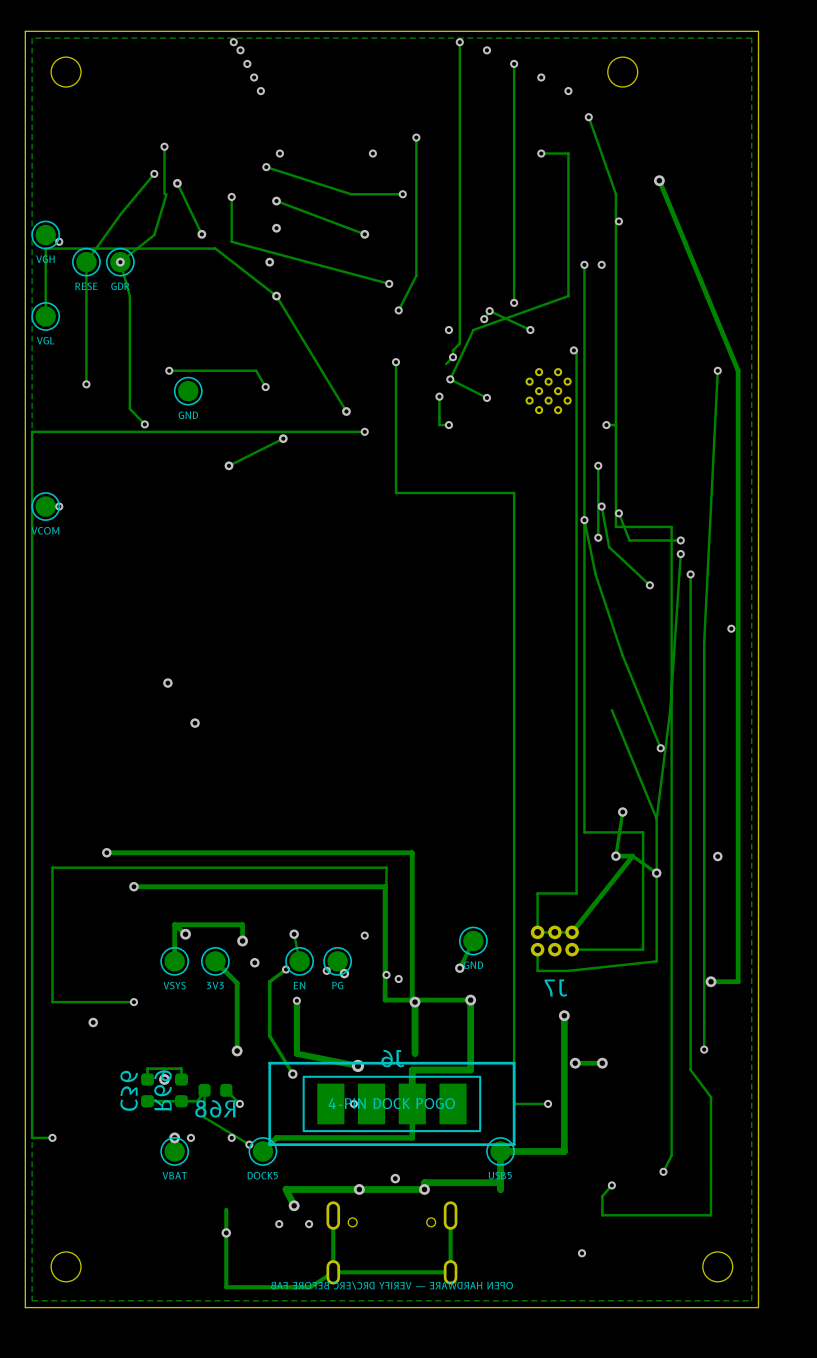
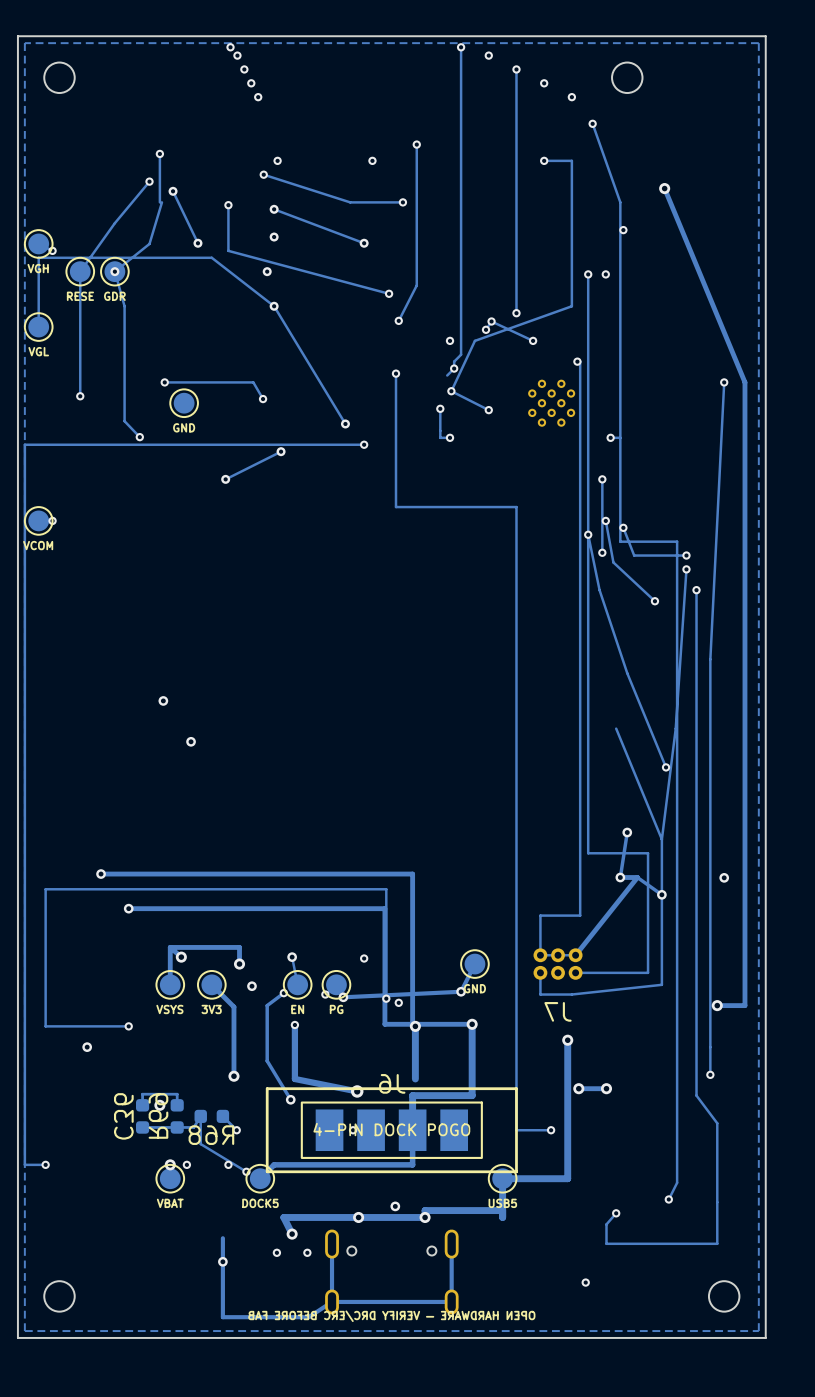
via: (731, 628) -> none
track: none -> (461, 991) (343, 997)

